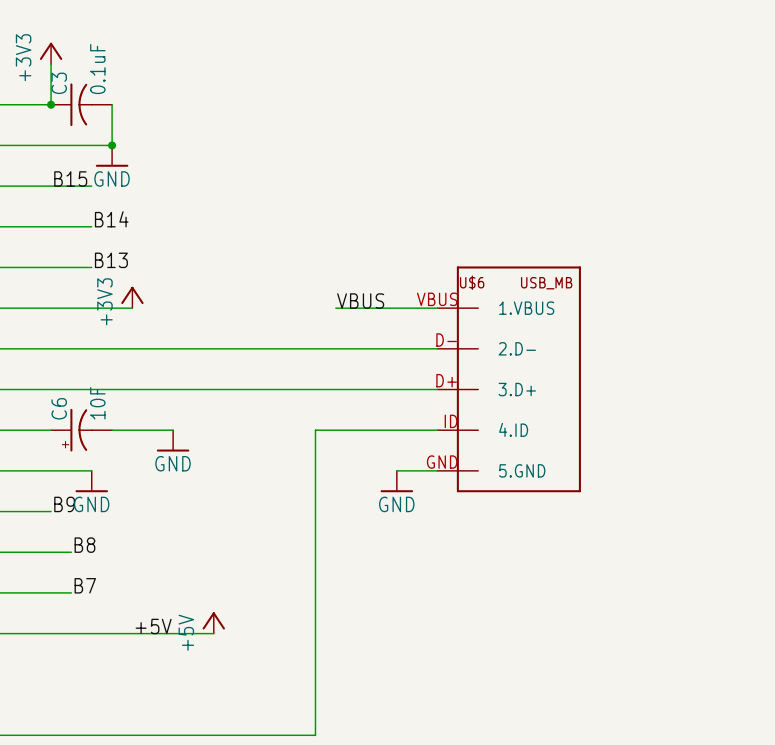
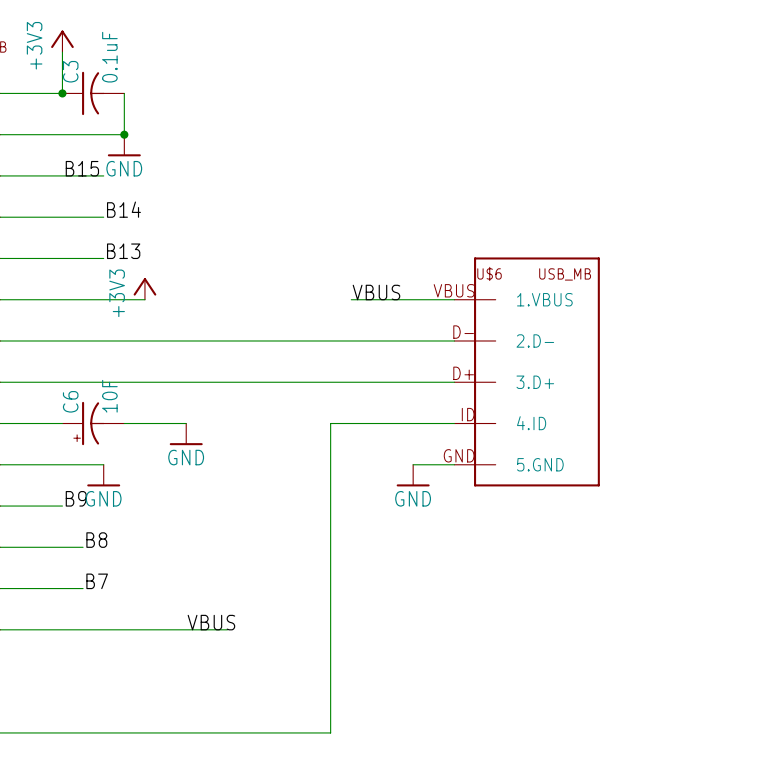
power symbol: +5V (213, 622) -> none
label: +5V (153, 626) -> none
label: none -> VBUS (211, 622)

